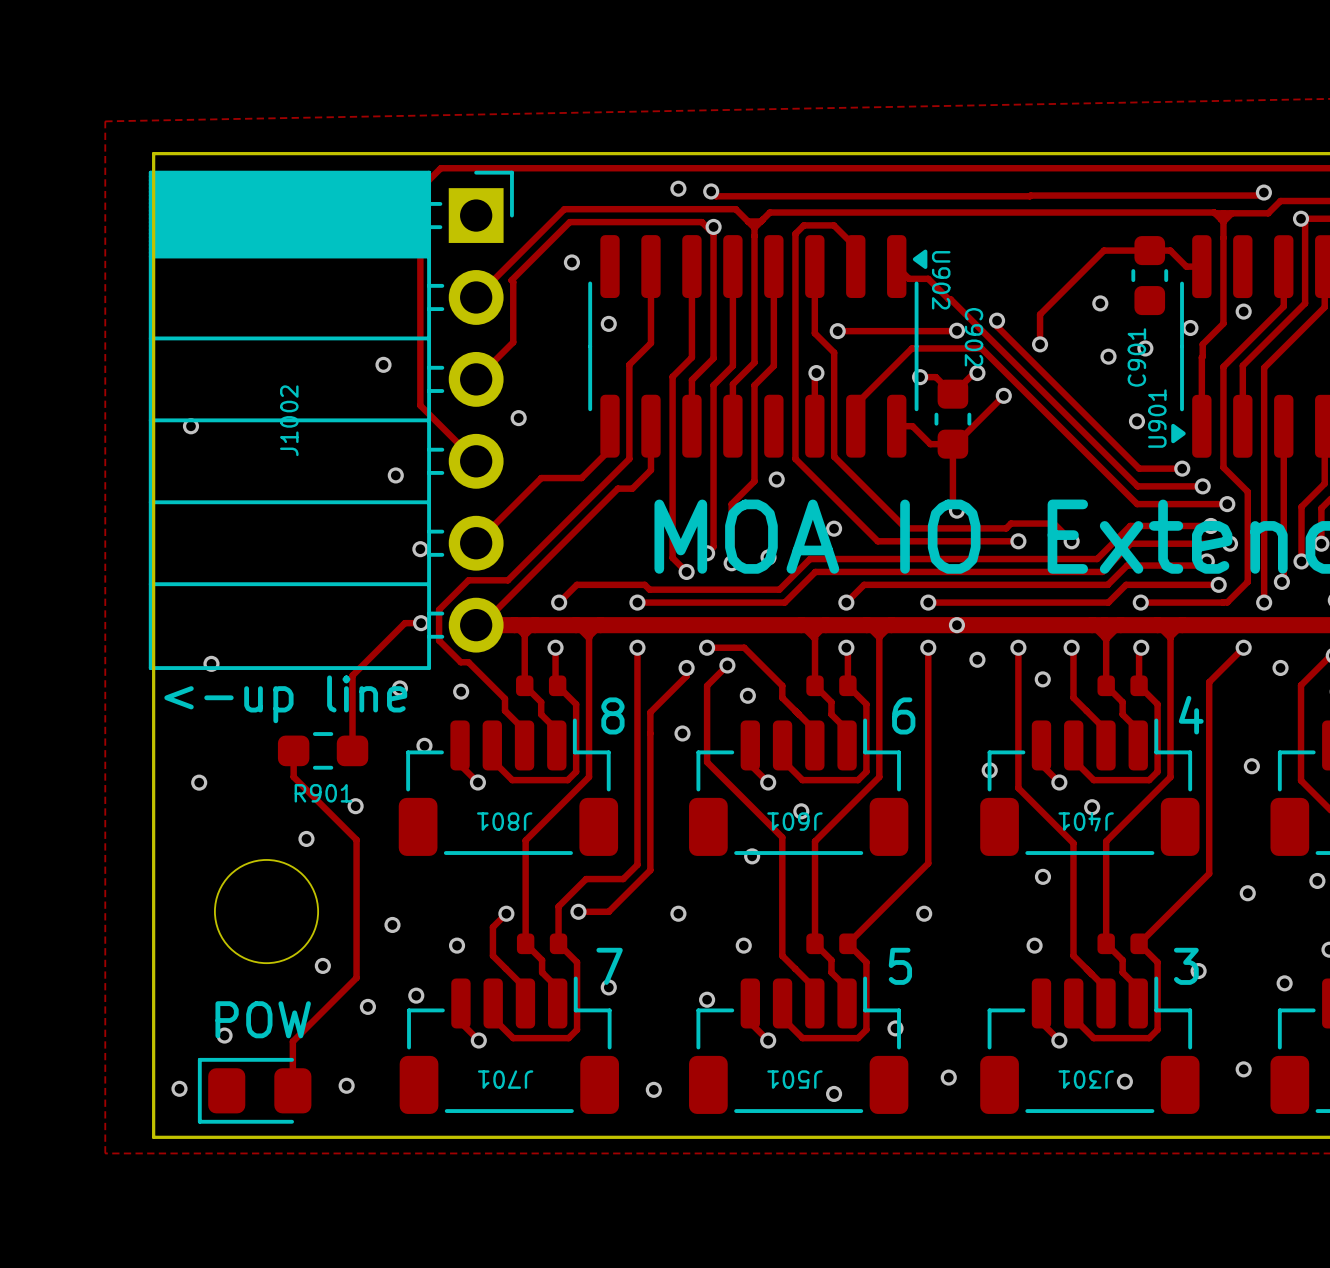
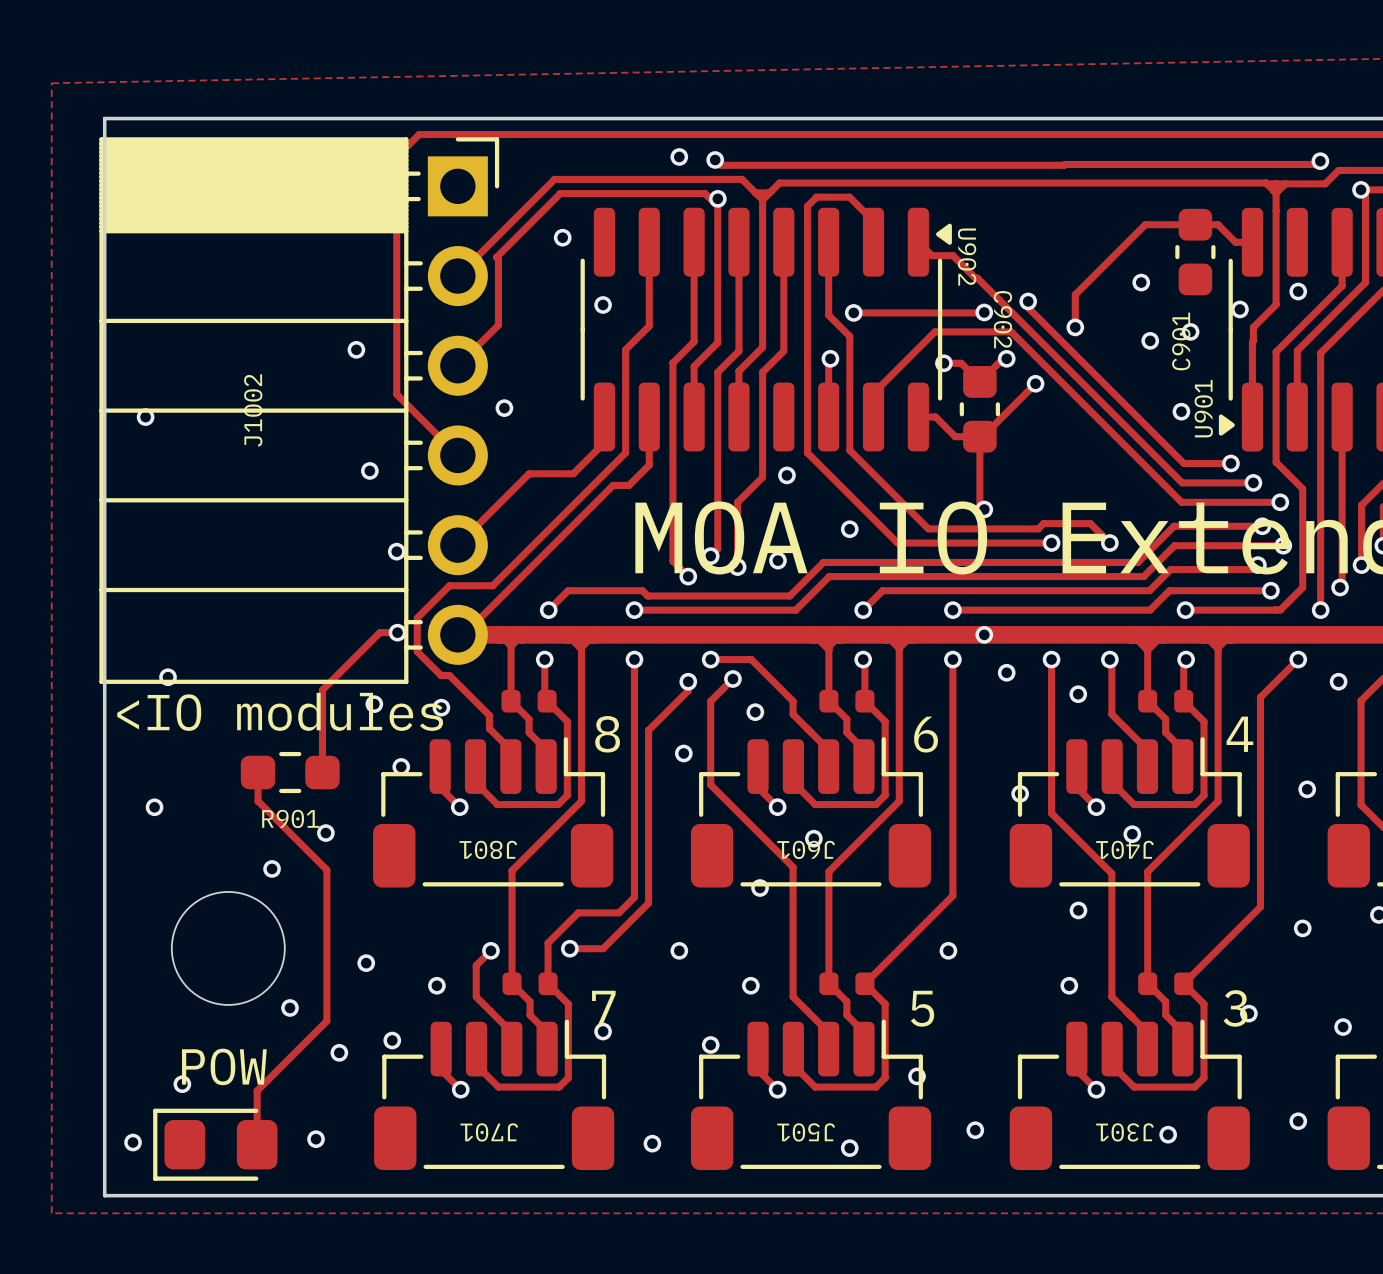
text: <-up line (285, 699) -> <IO modules (280, 711)

